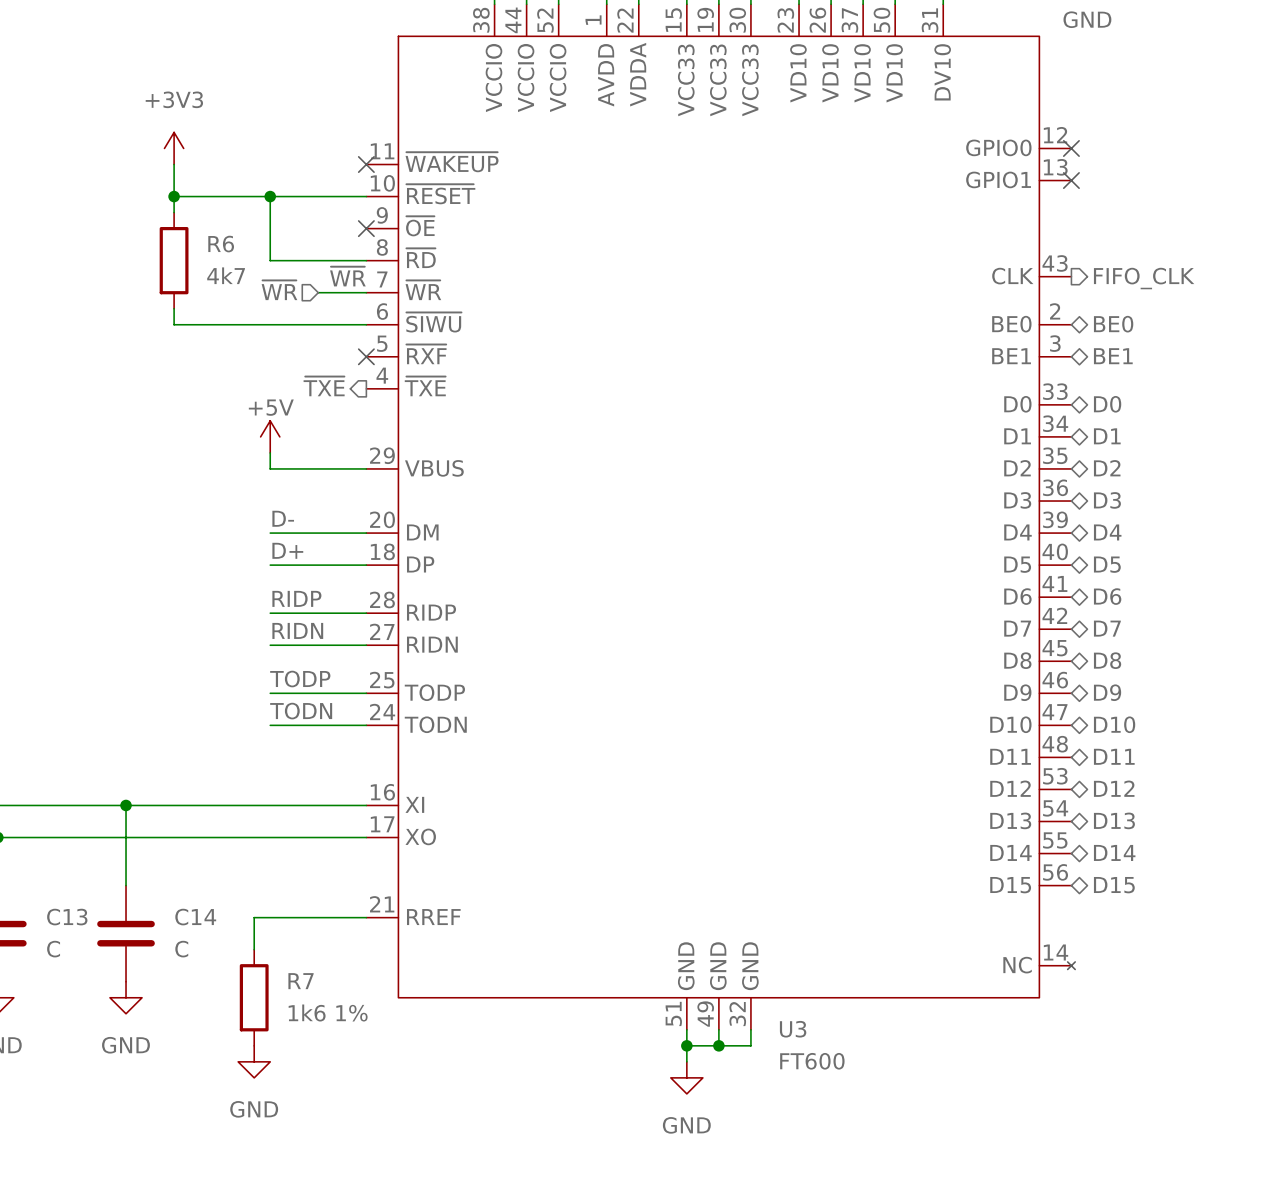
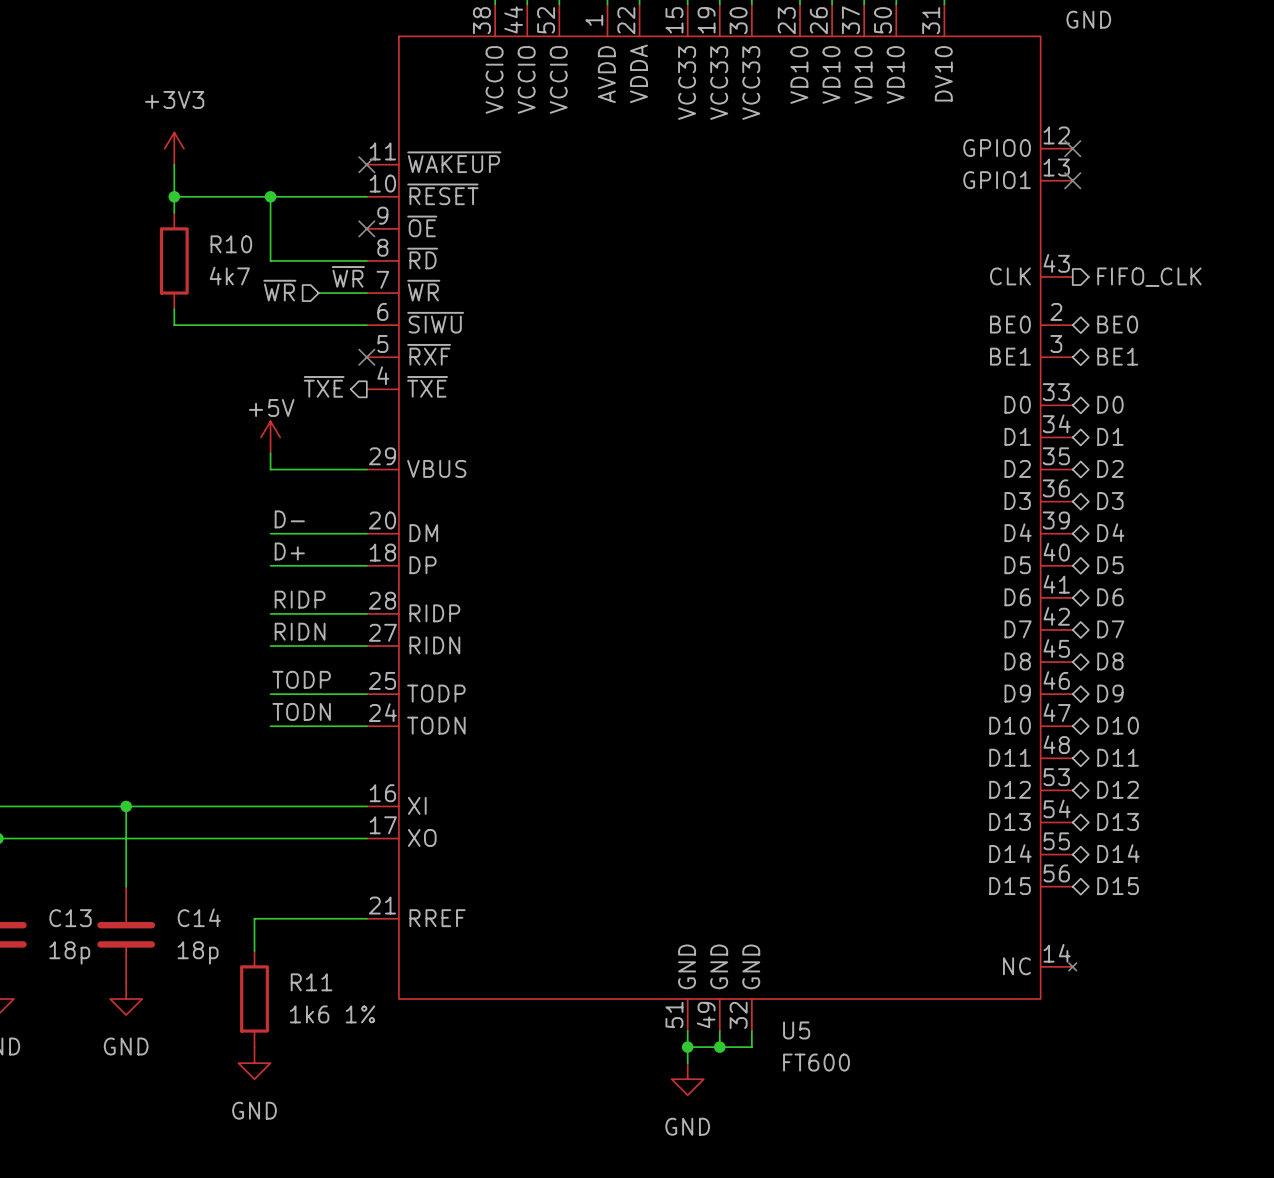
R6 name: R6 (221, 244) -> R10 (231, 244)
C13 value: C (53, 949) -> 18p (69, 952)
C14 value: C (181, 949) -> 18p (198, 952)
R7 name: R7 (301, 981) -> R11 (311, 982)
U3 name: U3 (793, 1029) -> U5 (796, 1030)

